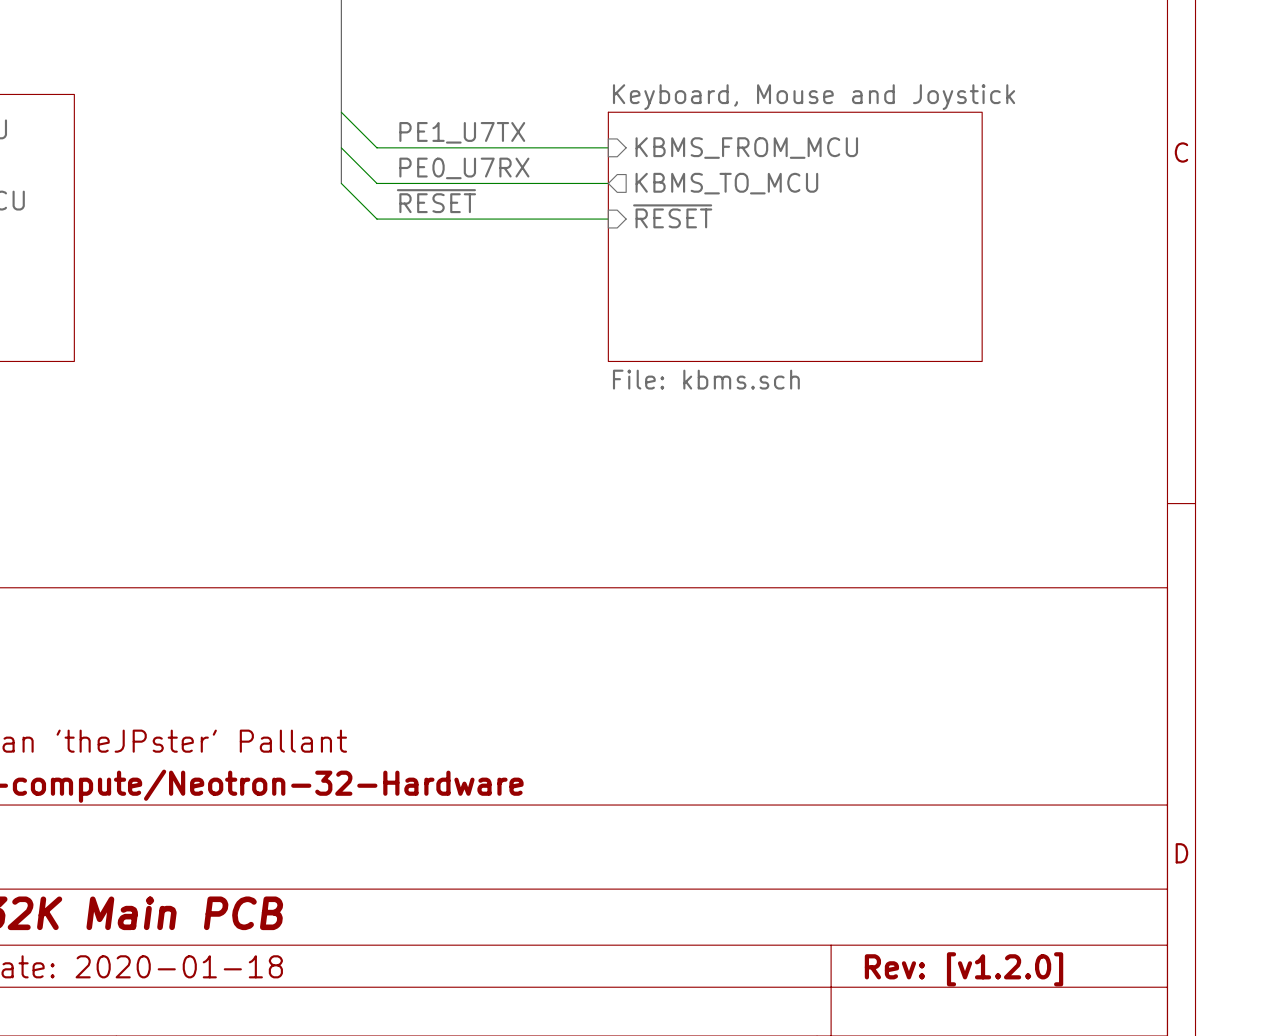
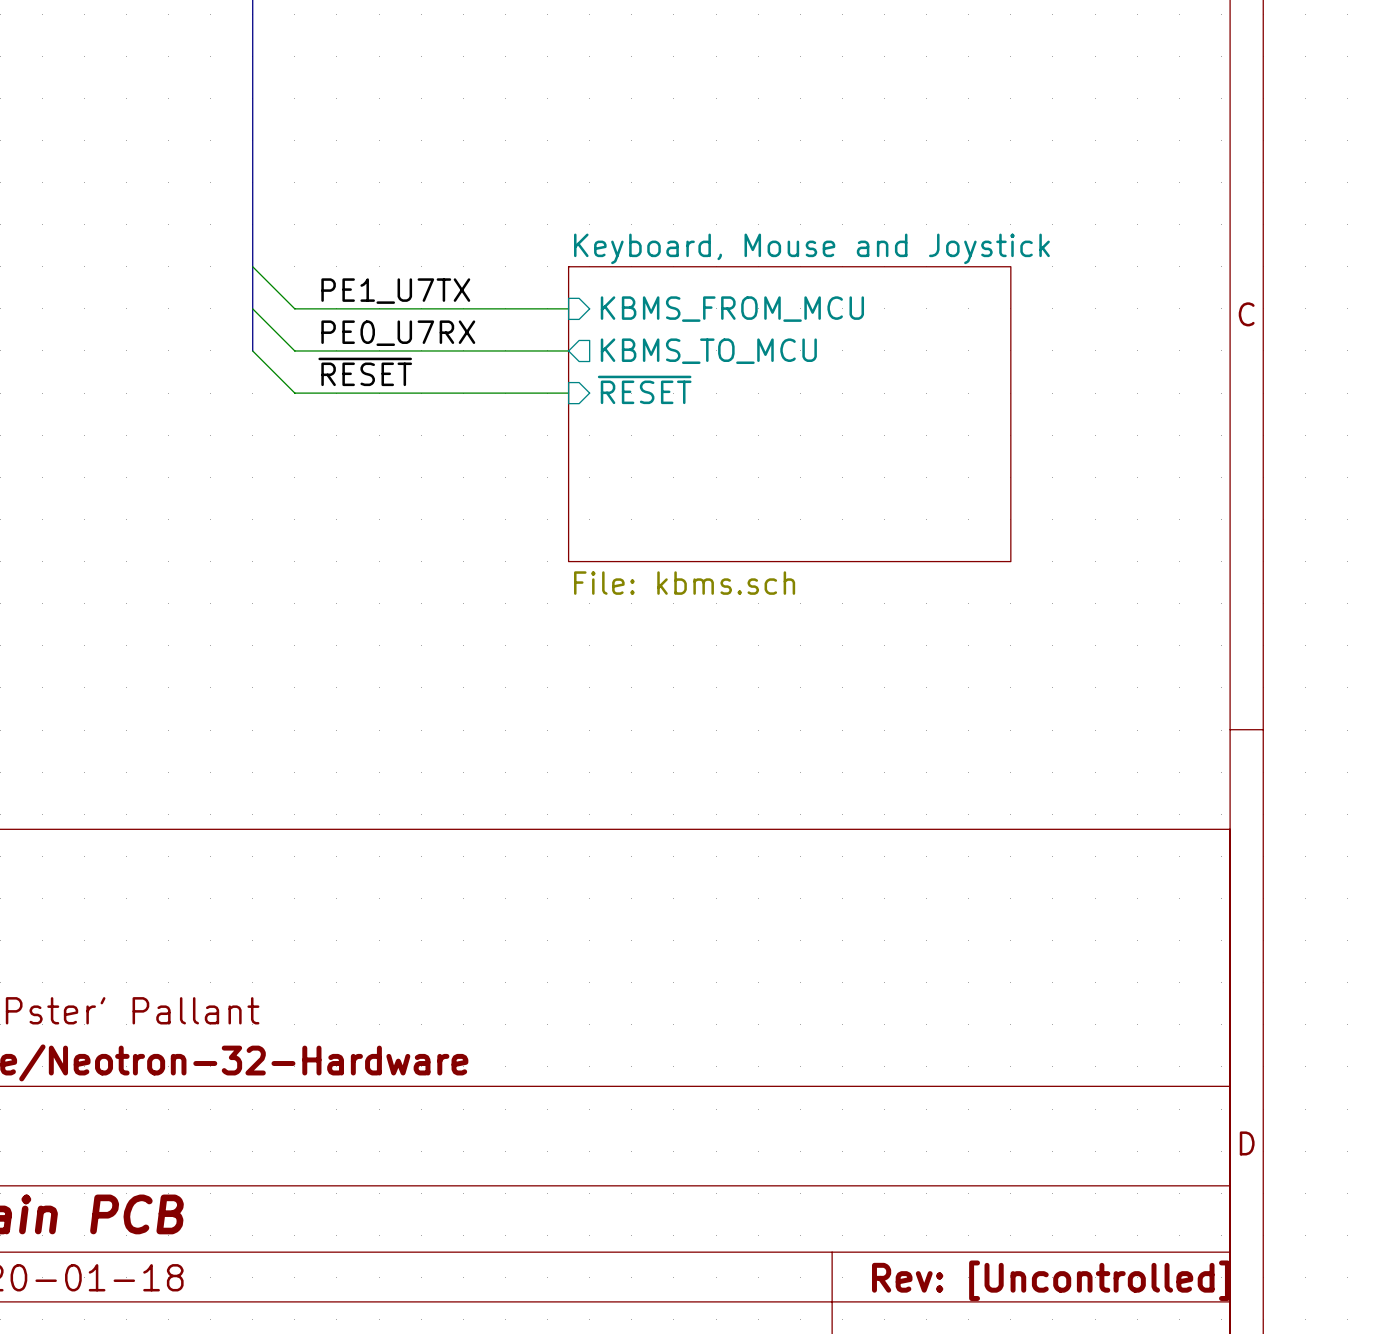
title block: Rev: [v1.2.0] (964, 969) -> Rev: [Uncontrolled] (1050, 1280)

